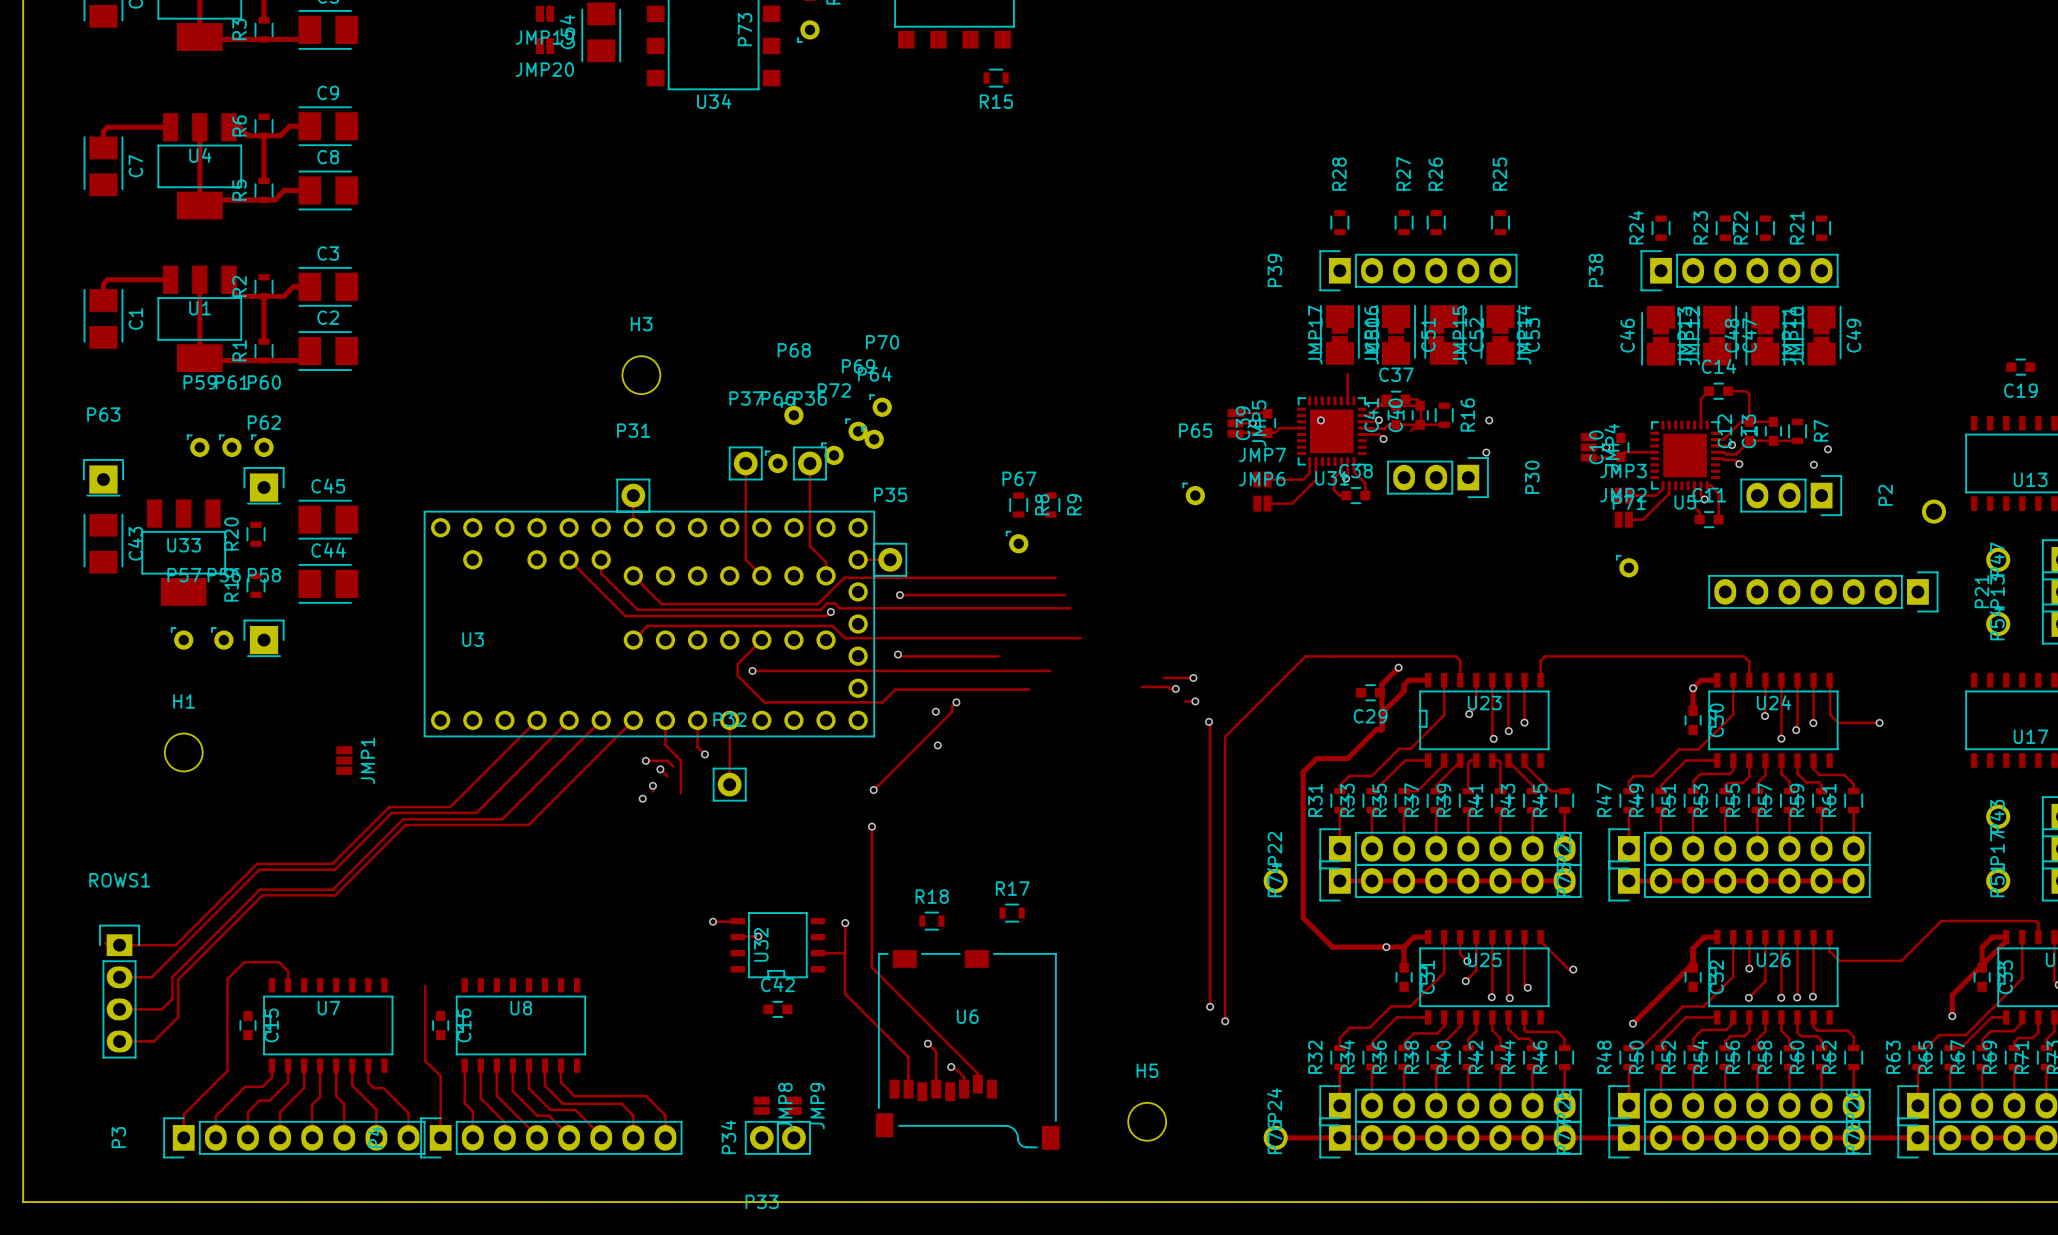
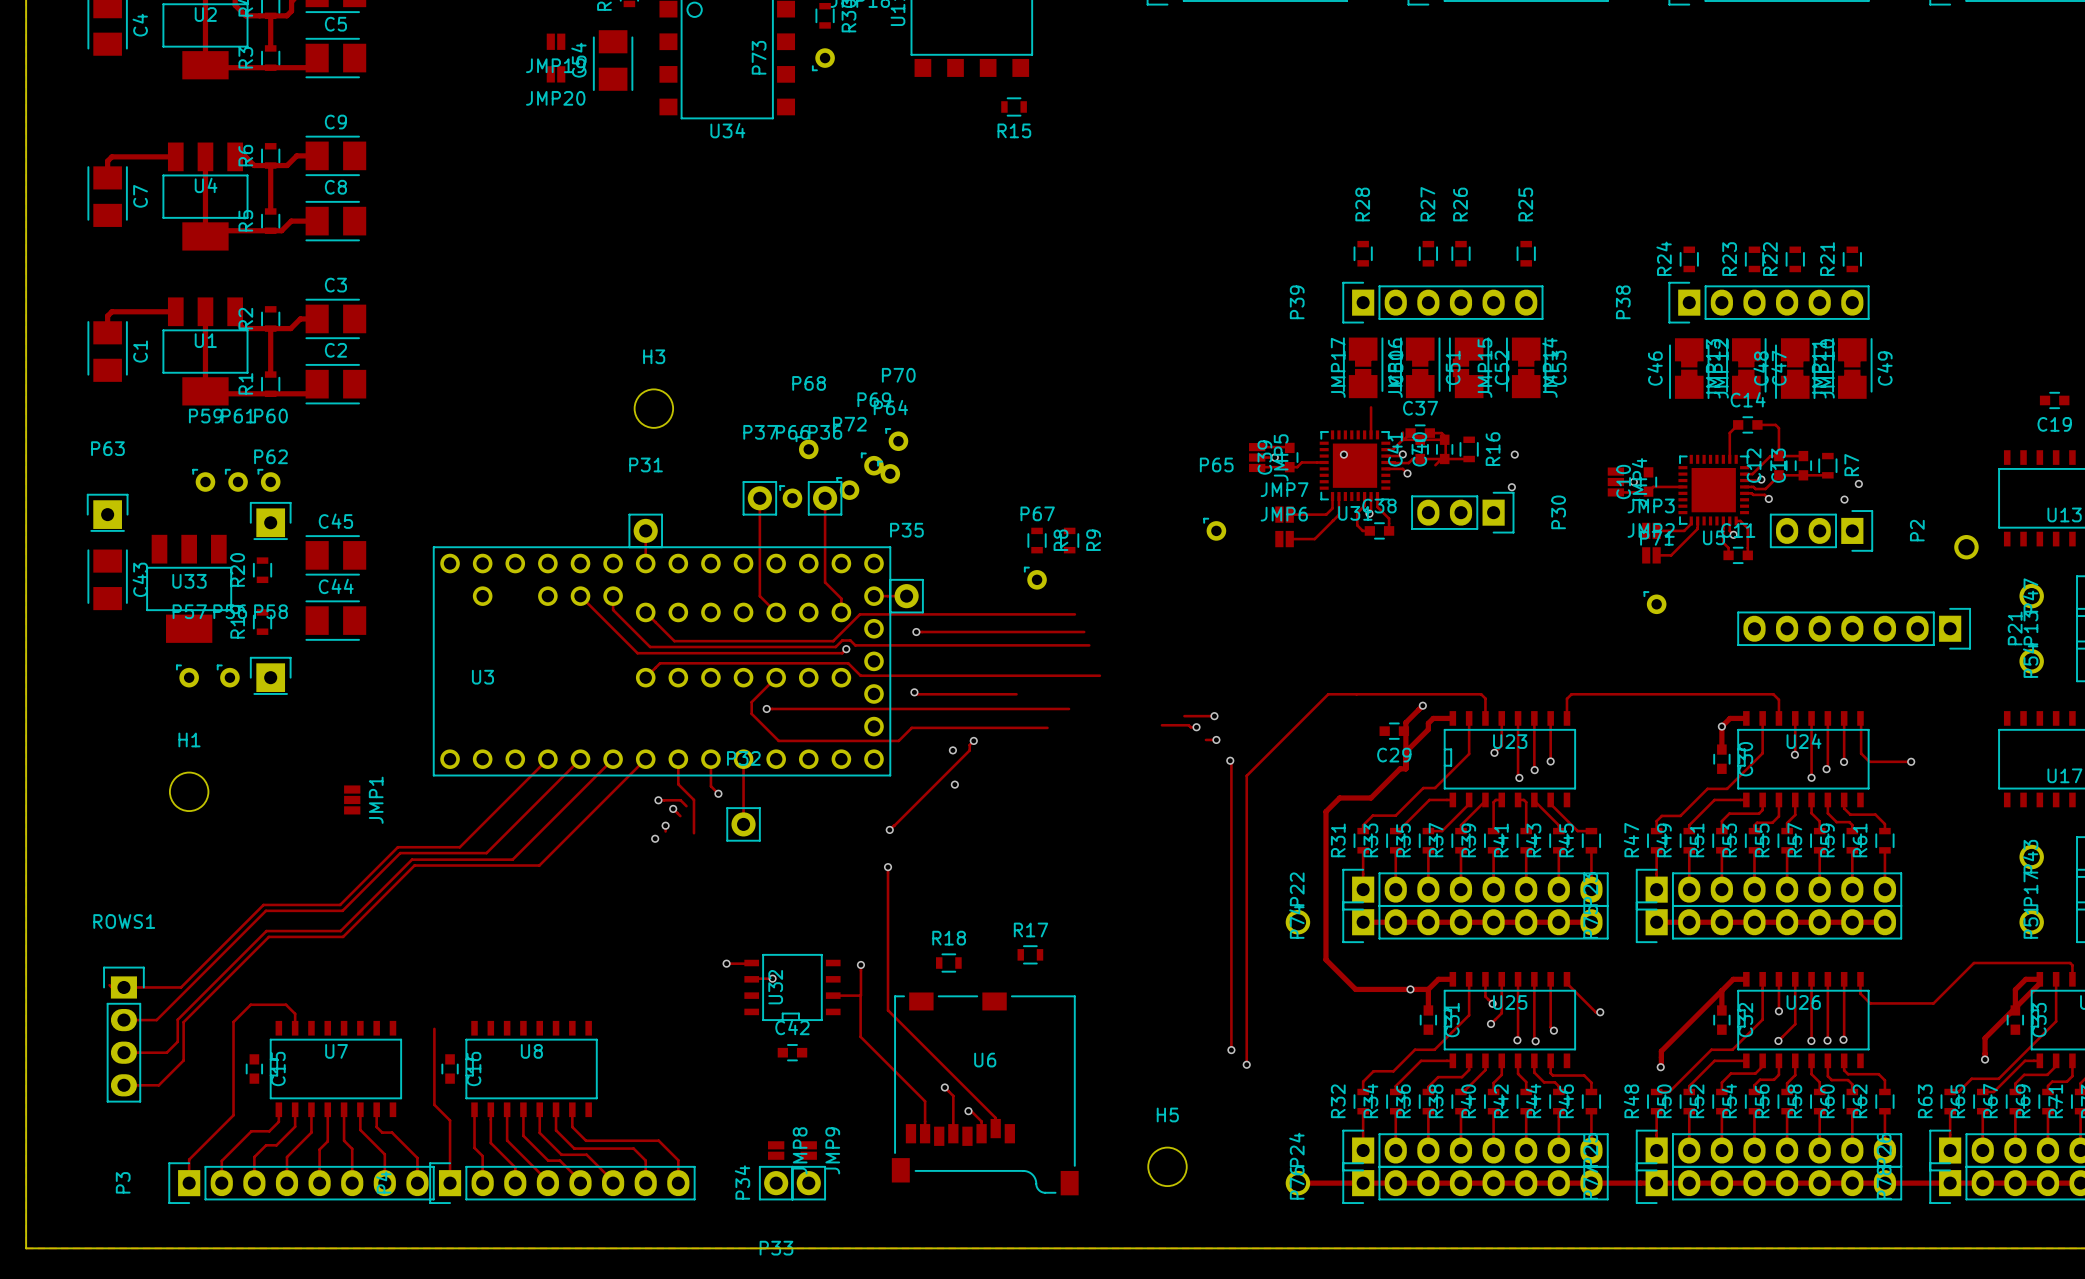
track: none -> (1721, 990) (1661, 1051) (1661, 1063)
track: (1693, 963) (1632, 1023) -> none

